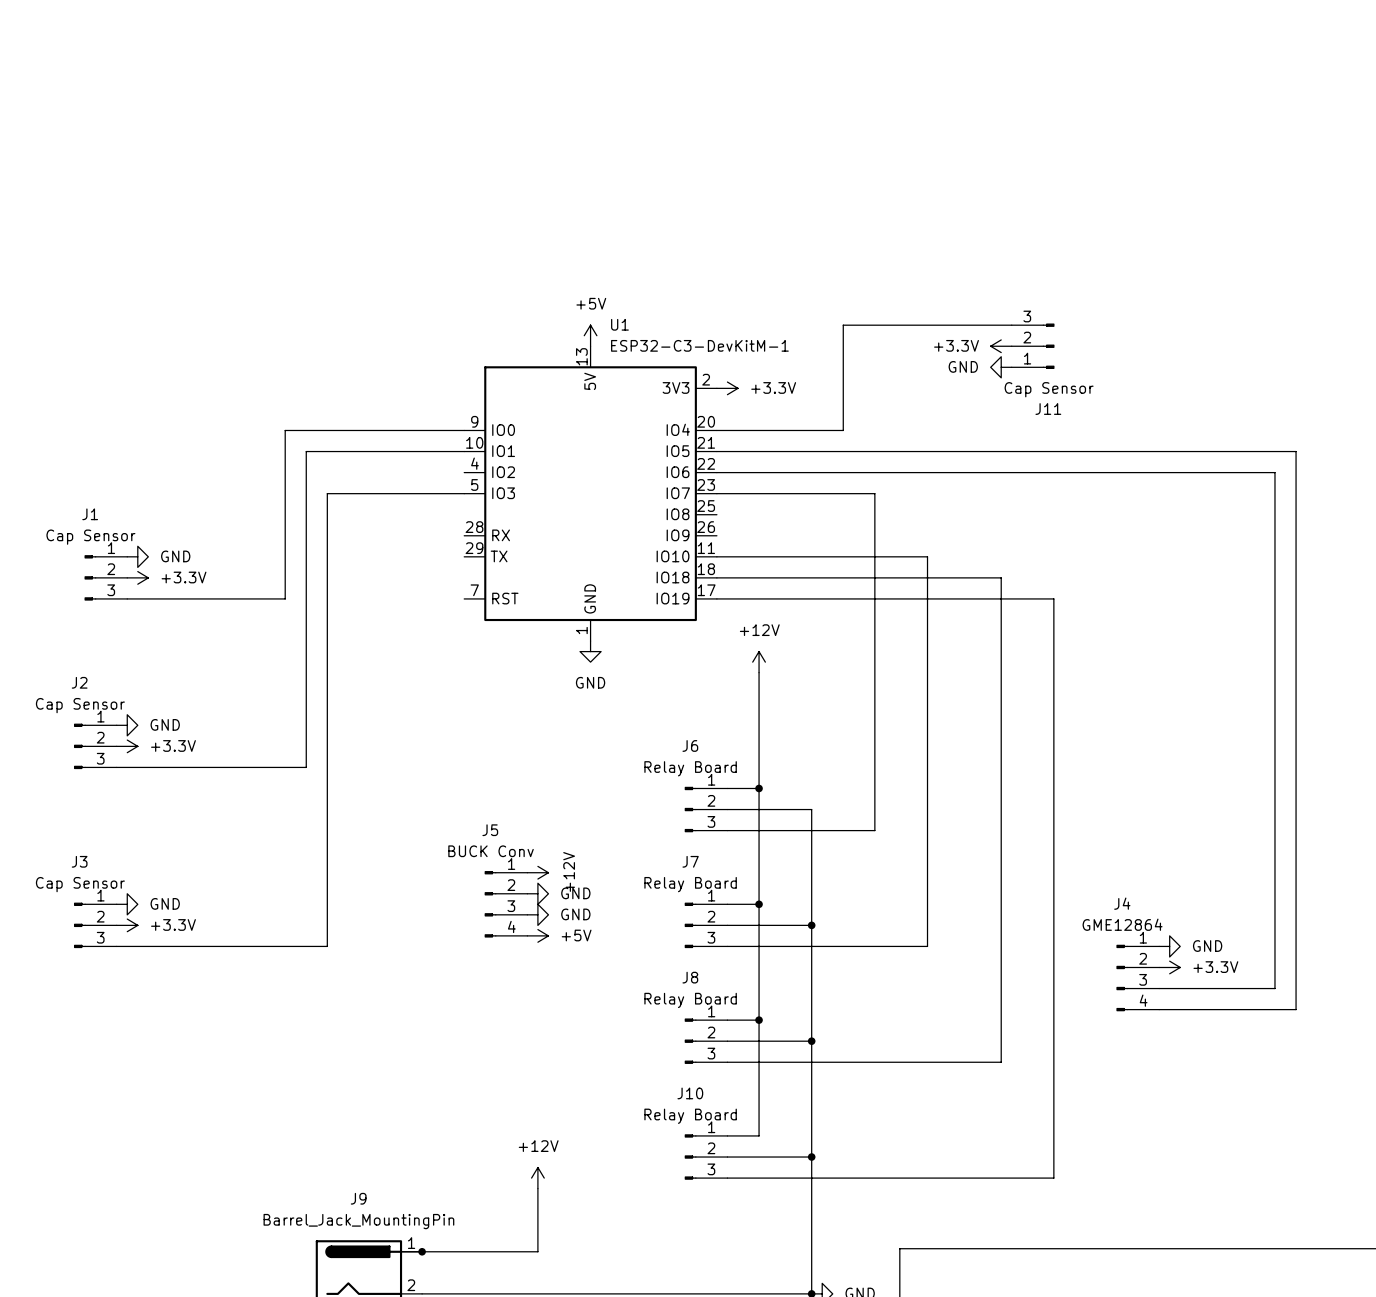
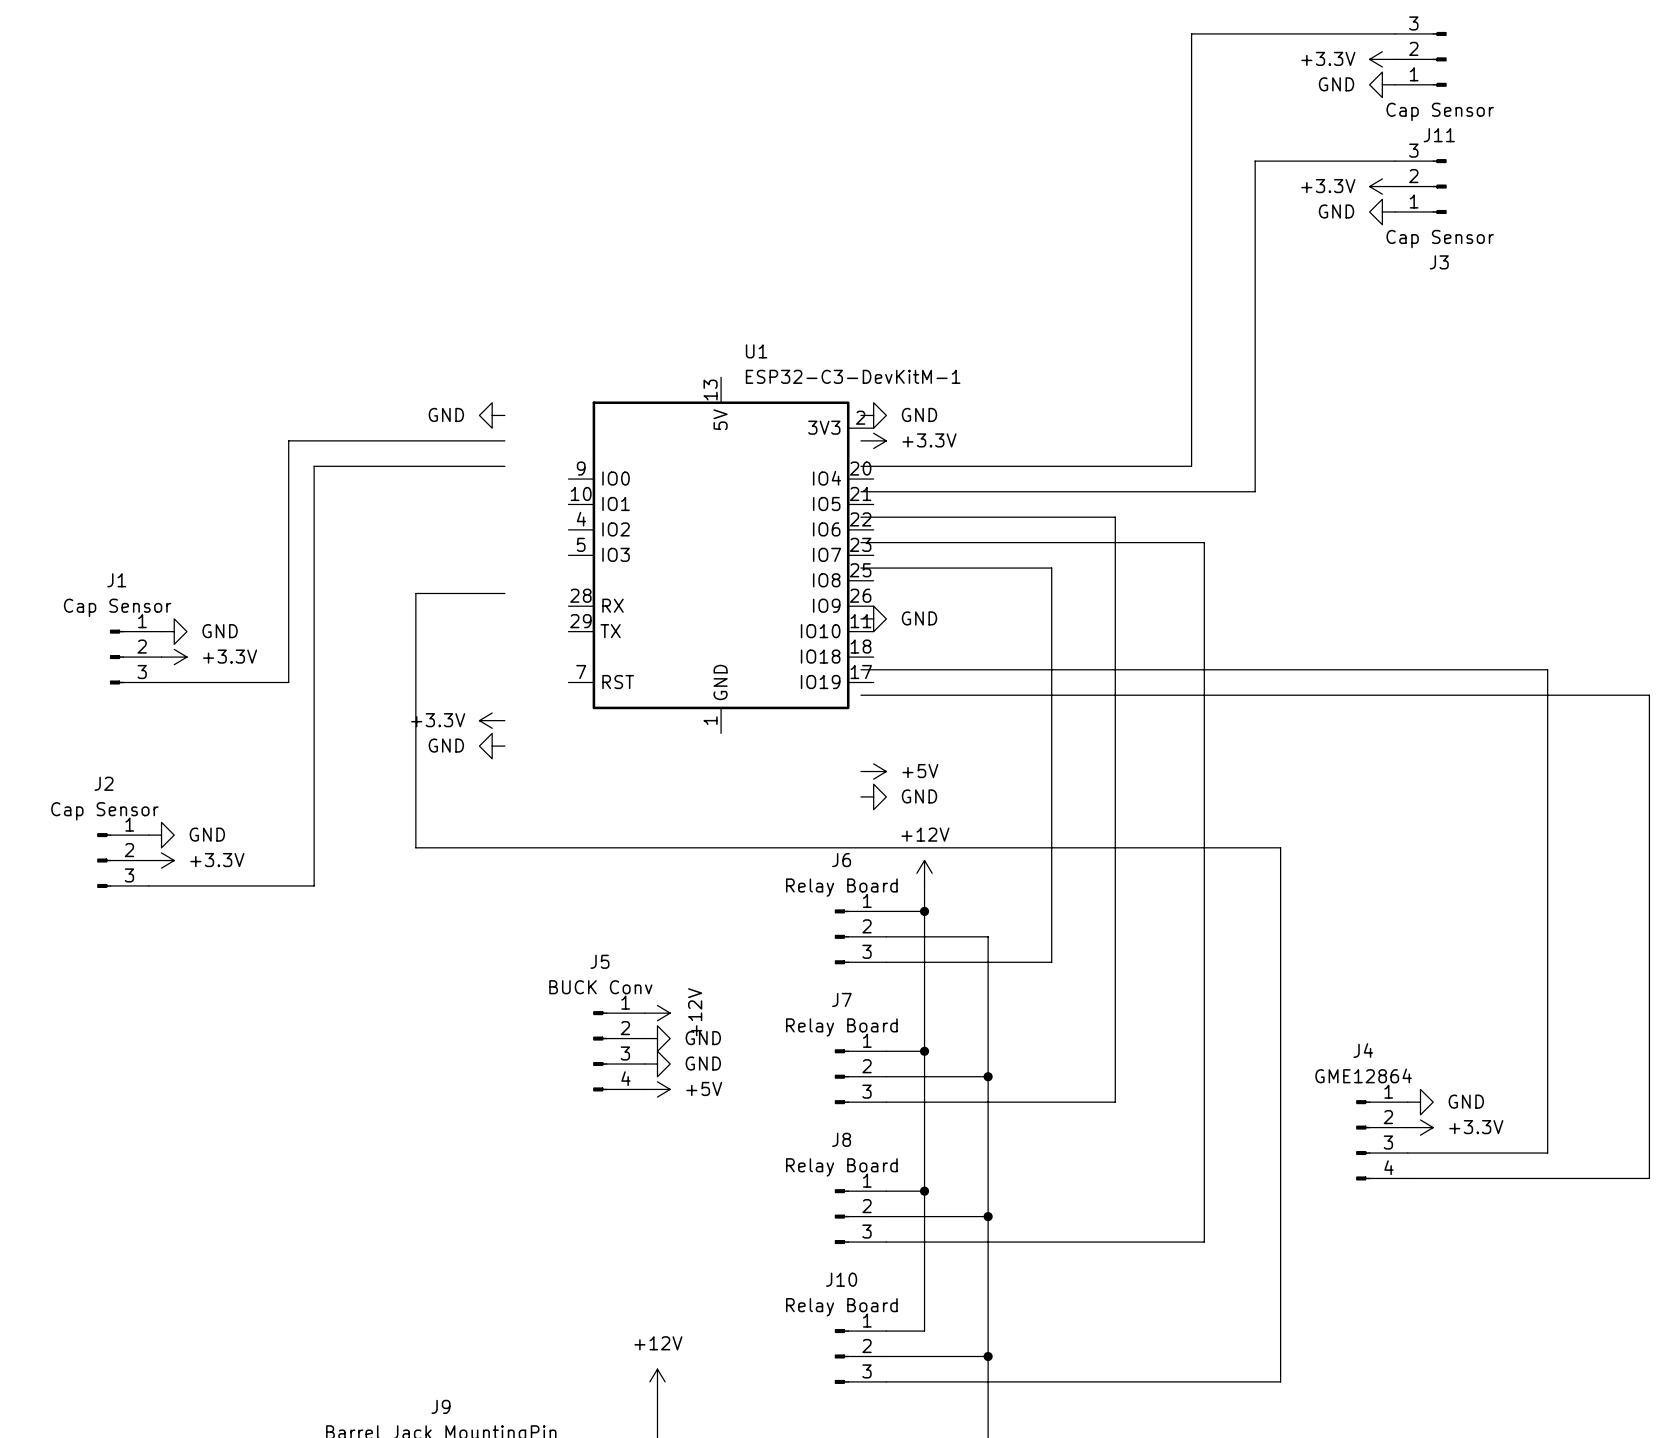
wire: none -> (1395, 33) (1191, 33) (1191, 466) (860, 466)
power symbol: none -> +3.3V (1382, 59)
power symbol: none -> GND (1382, 84)
wire: none -> (1395, 161) (1255, 161) (1255, 491) (860, 491)
power symbol: none -> +3.3V (1382, 186)
power symbol: none -> GND (1382, 211)
wire: (1011, 325) (843, 325) (843, 430) (716, 430) -> none
power symbol: +5V (590, 335) -> none
power symbol: +3.3V (1001, 346) -> none
J11 position: (1033, 346) -> (1420, 59)
power symbol: GND (1001, 367) -> none
power symbol: none -> GND (492, 415)
power symbol: none -> GND (873, 415)
power symbol position: +3.3V (727, 388) -> +3.3V (873, 440)
wire: (464, 430) (285, 430) (285, 598) (232, 598) -> (504, 440) (288, 440) (288, 682)
wire: (464, 451) (306, 451) (306, 767) (253, 767) -> (504, 466) (314, 466) (314, 885)
wire: (716, 451) (1296, 451) (1296, 1009) -> (860, 695) (1649, 695) (1649, 1178) (1573, 1178)
wire: (716, 472) (1274, 472) (1274, 588) -> (860, 669) (1547, 669)
wire: (464, 493) (327, 493) (327, 946) (116, 946) -> none
wire: (716, 493) (874, 493) (874, 830) (864, 830) -> (860, 568) (1051, 568) (1051, 962)
power symbol: none -> GND (873, 618)
wire: (716, 556) (927, 556) (927, 946) (916, 946) -> (860, 517) (1115, 517) (1115, 1102)
wire: (716, 577) (1001, 577) (1001, 1062) (990, 1062) -> (860, 542) (1204, 542) (1204, 1242)
wire: (716, 598) (1053, 598) (1053, 735) -> (504, 593) (415, 593) (415, 847) (1280, 847)
power symbol: none -> +3.3V (492, 720)
power symbol: none -> GND (492, 746)
power symbol: GND (590, 651) -> none
power symbol position: +12V (759, 662) -> +12V (924, 873)
power symbol: none -> +5V (873, 771)
wire: (759, 672) (759, 767) -> none
power symbol: none -> GND (873, 796)
power symbol: GND (127, 904) -> none
J3 rotation: 0° (79, 925) -> 180° (1439, 186)
J3 position: (95, 925) -> (1420, 186)
power symbol: +3.3V (127, 925) -> none

